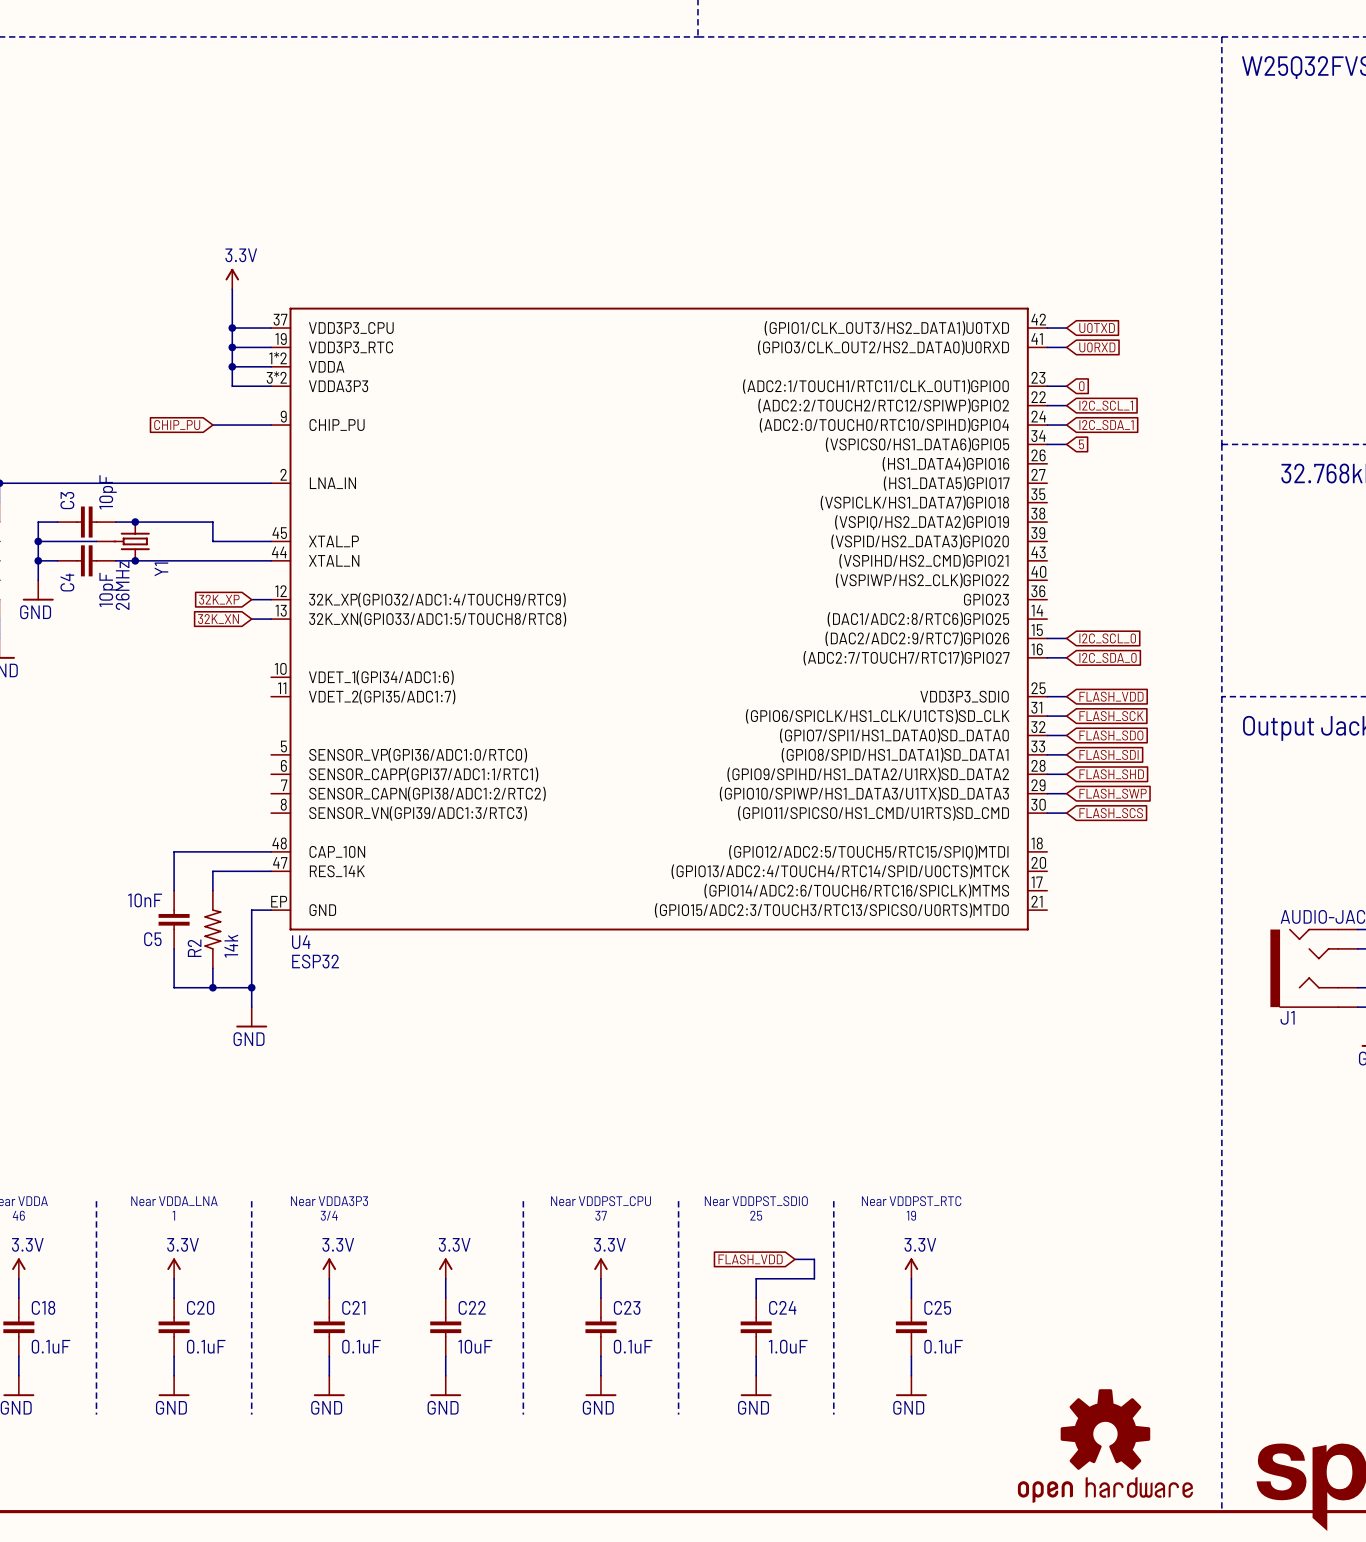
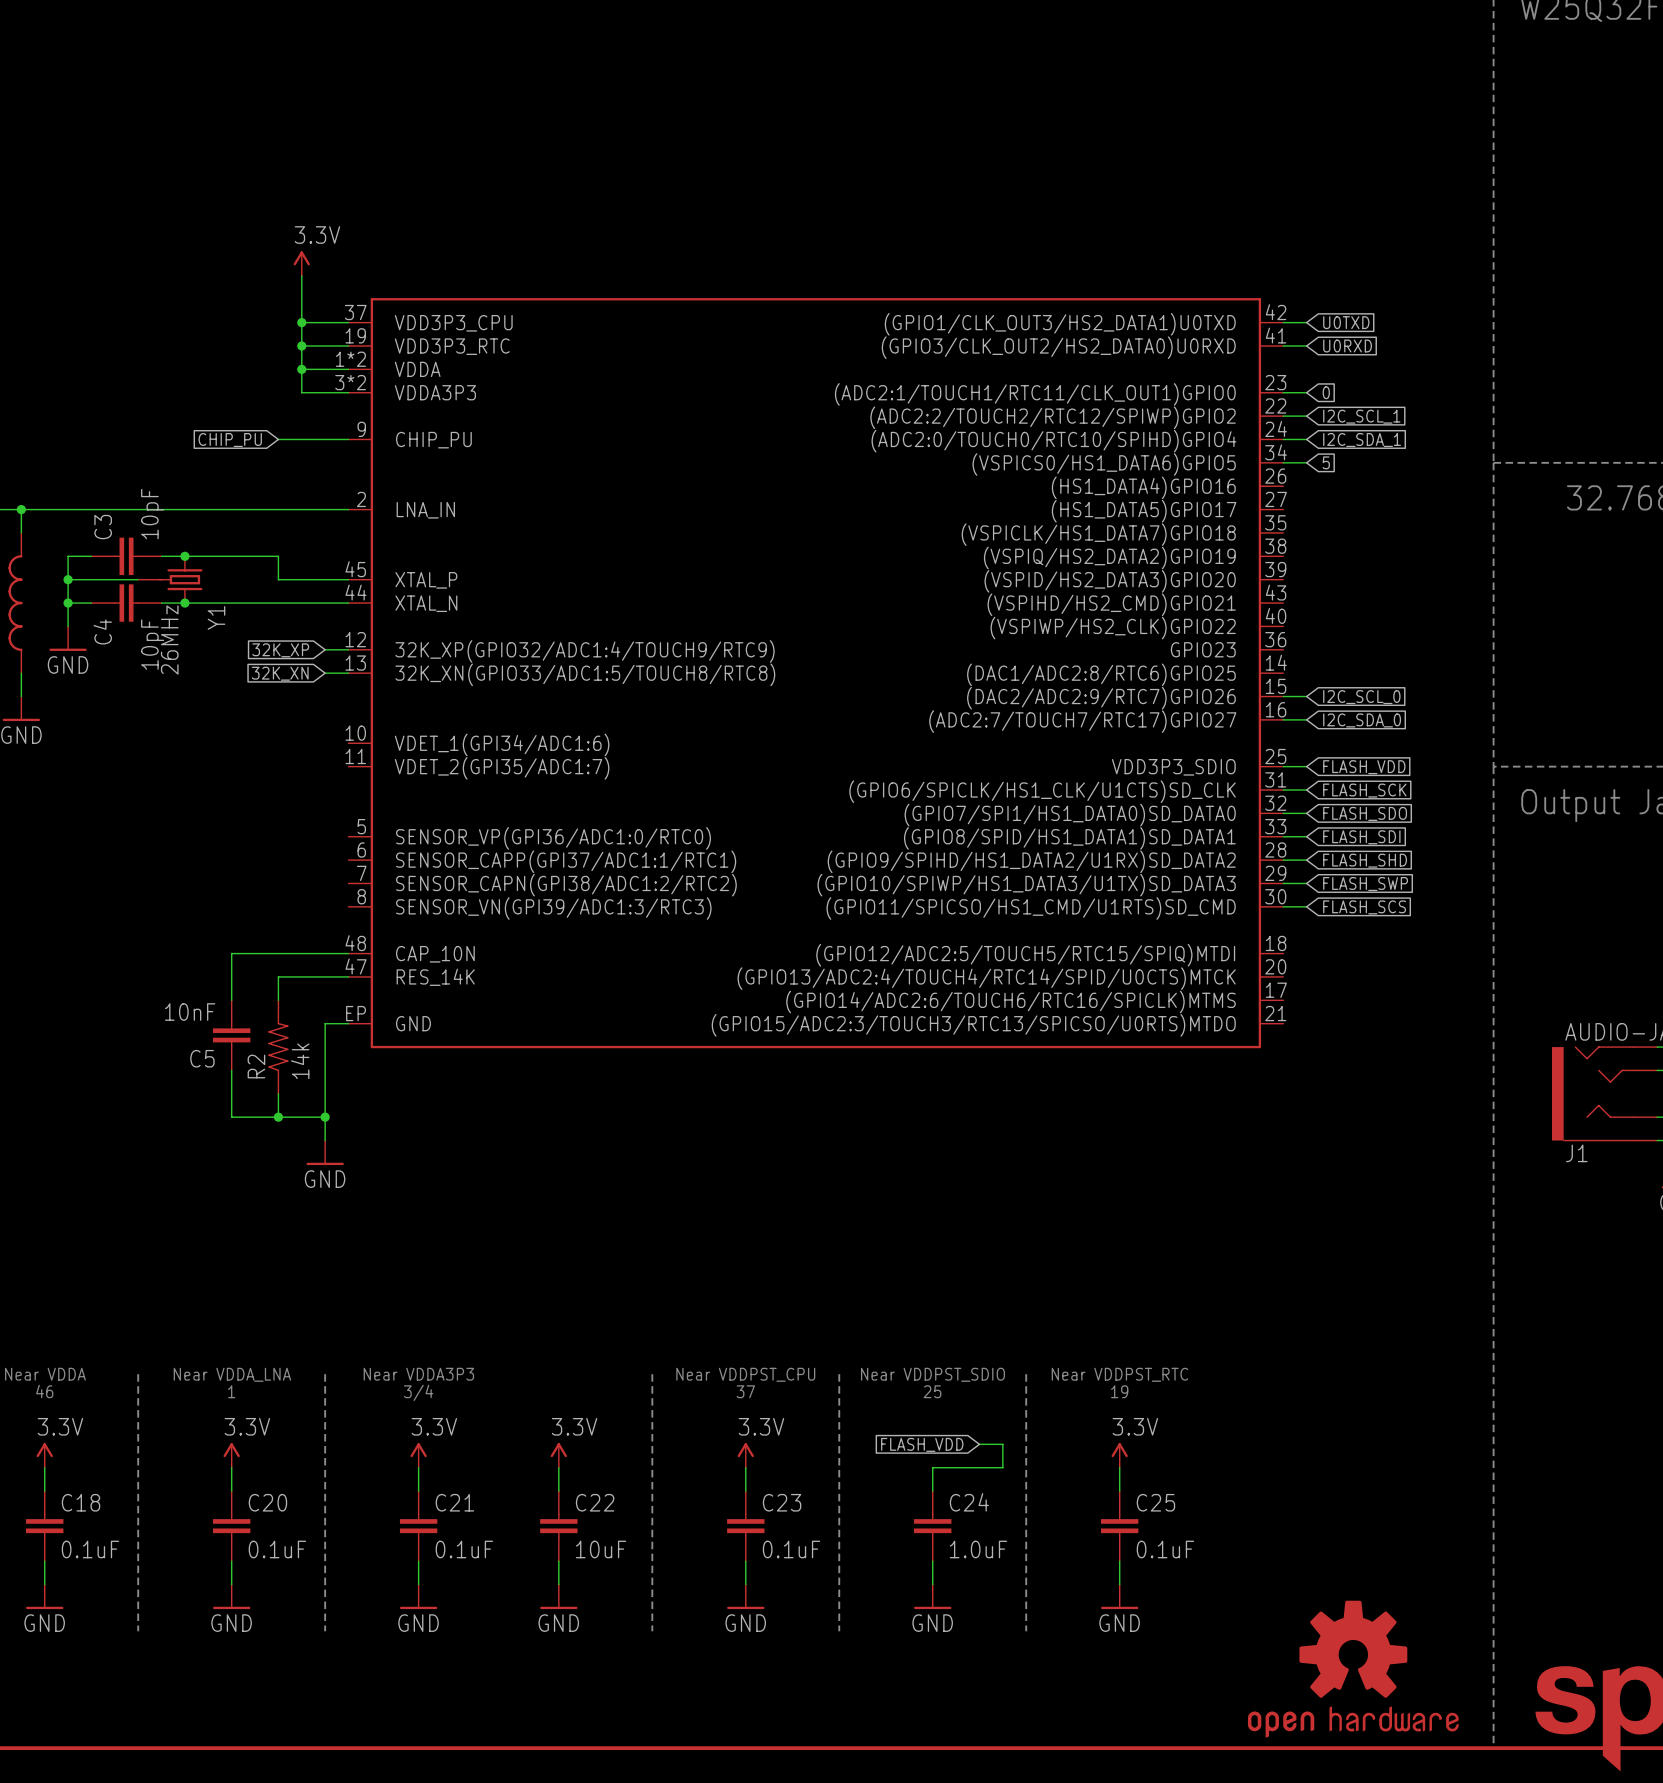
U4 name: U4 (301, 942) -> none
U4 value: ESP32 (315, 961) -> none

